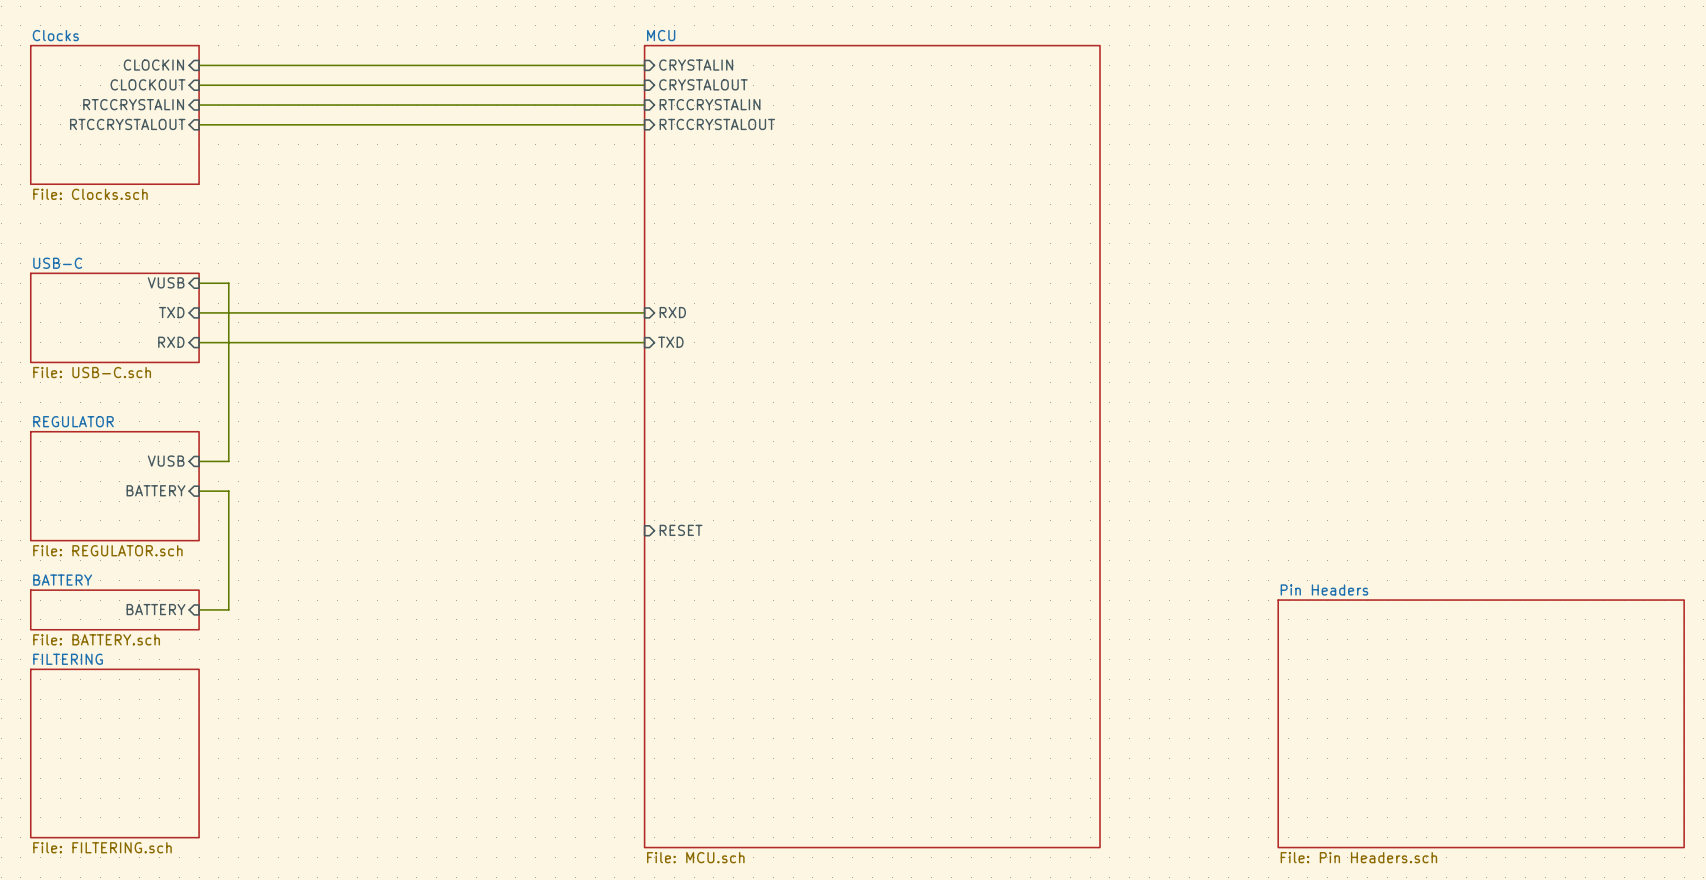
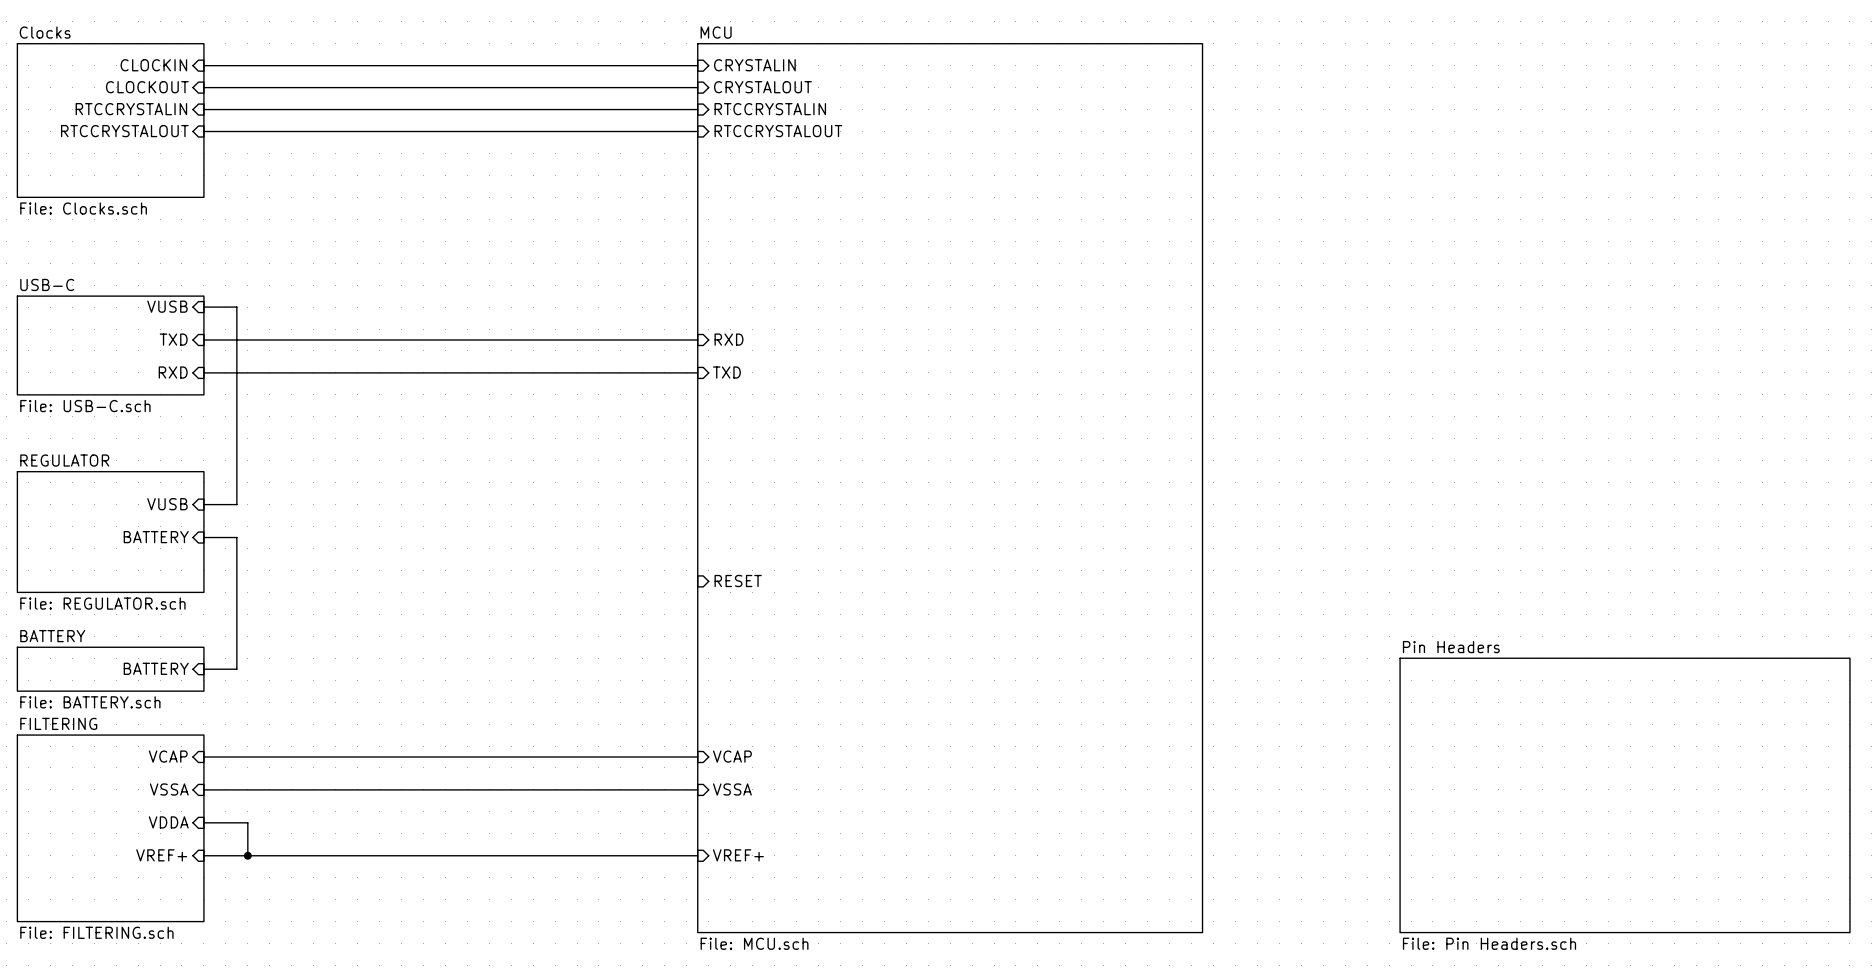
sheet pin: none -> VCAP (168, 756)
sheet pin: none -> VCAP (732, 756)
wire: none -> (203, 756) (697, 756)
sheet pin: none -> VSSA (169, 789)
wire: none -> (203, 789) (697, 789)
sheet pin: none -> VSSA (732, 789)
sheet pin: none -> VDDA (168, 822)
wire: none -> (203, 822) (247, 822) (247, 855)
sheet pin: none -> VREF+ (161, 855)
sheet pin: none -> VREF+ (738, 855)
wire: none -> (203, 855) (697, 855)
junction: none -> (247, 855)

